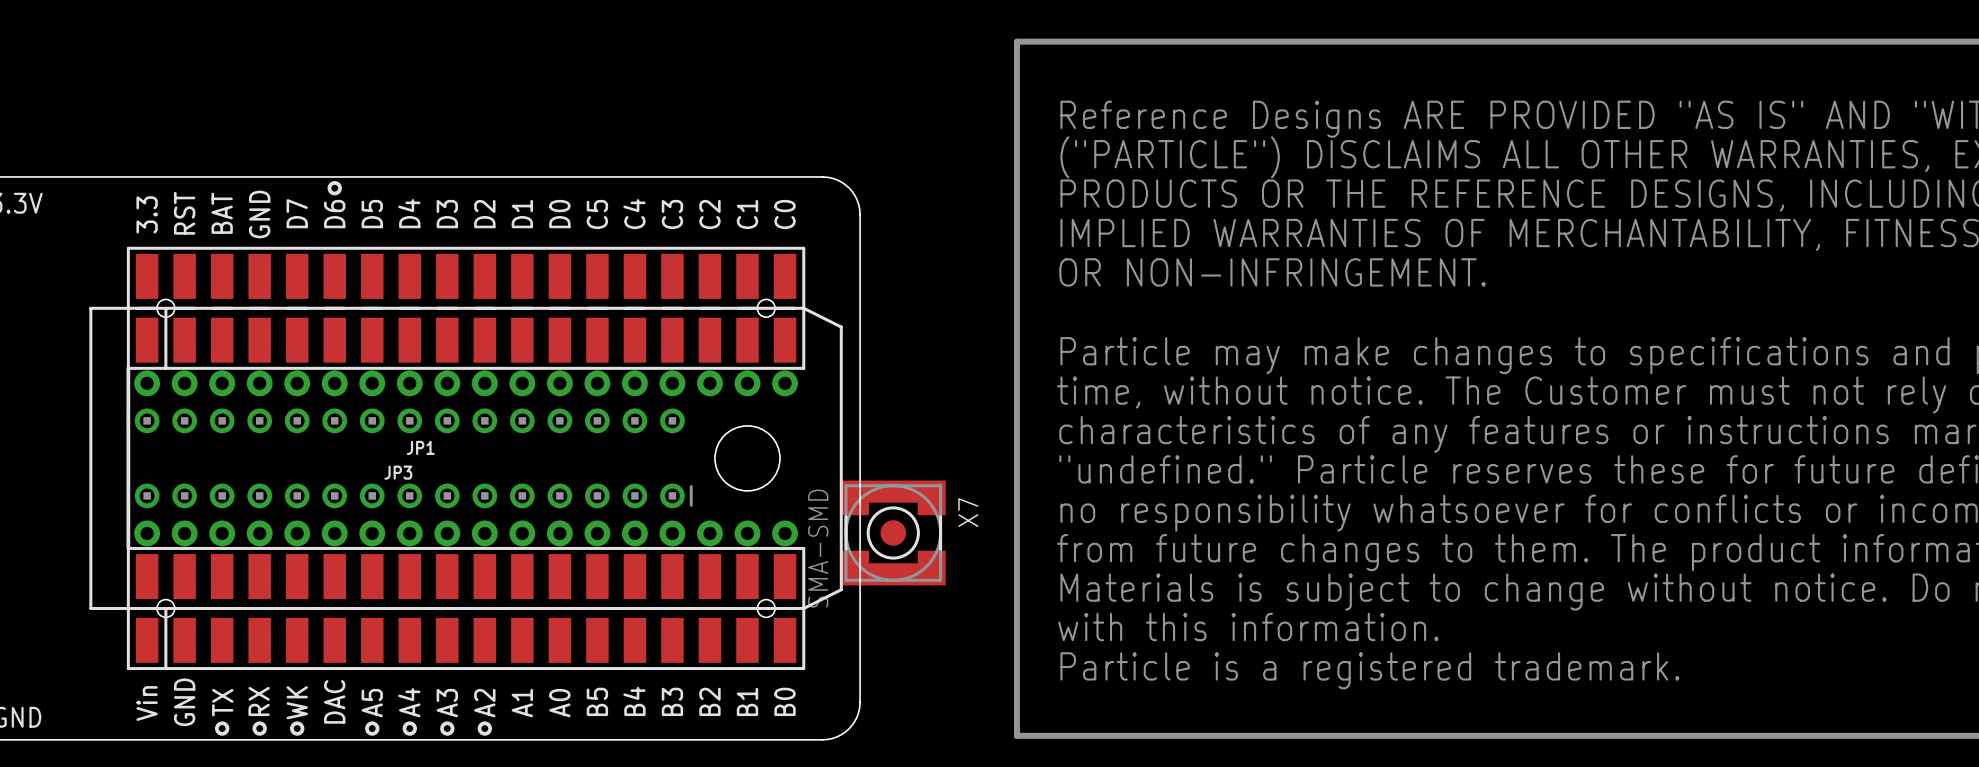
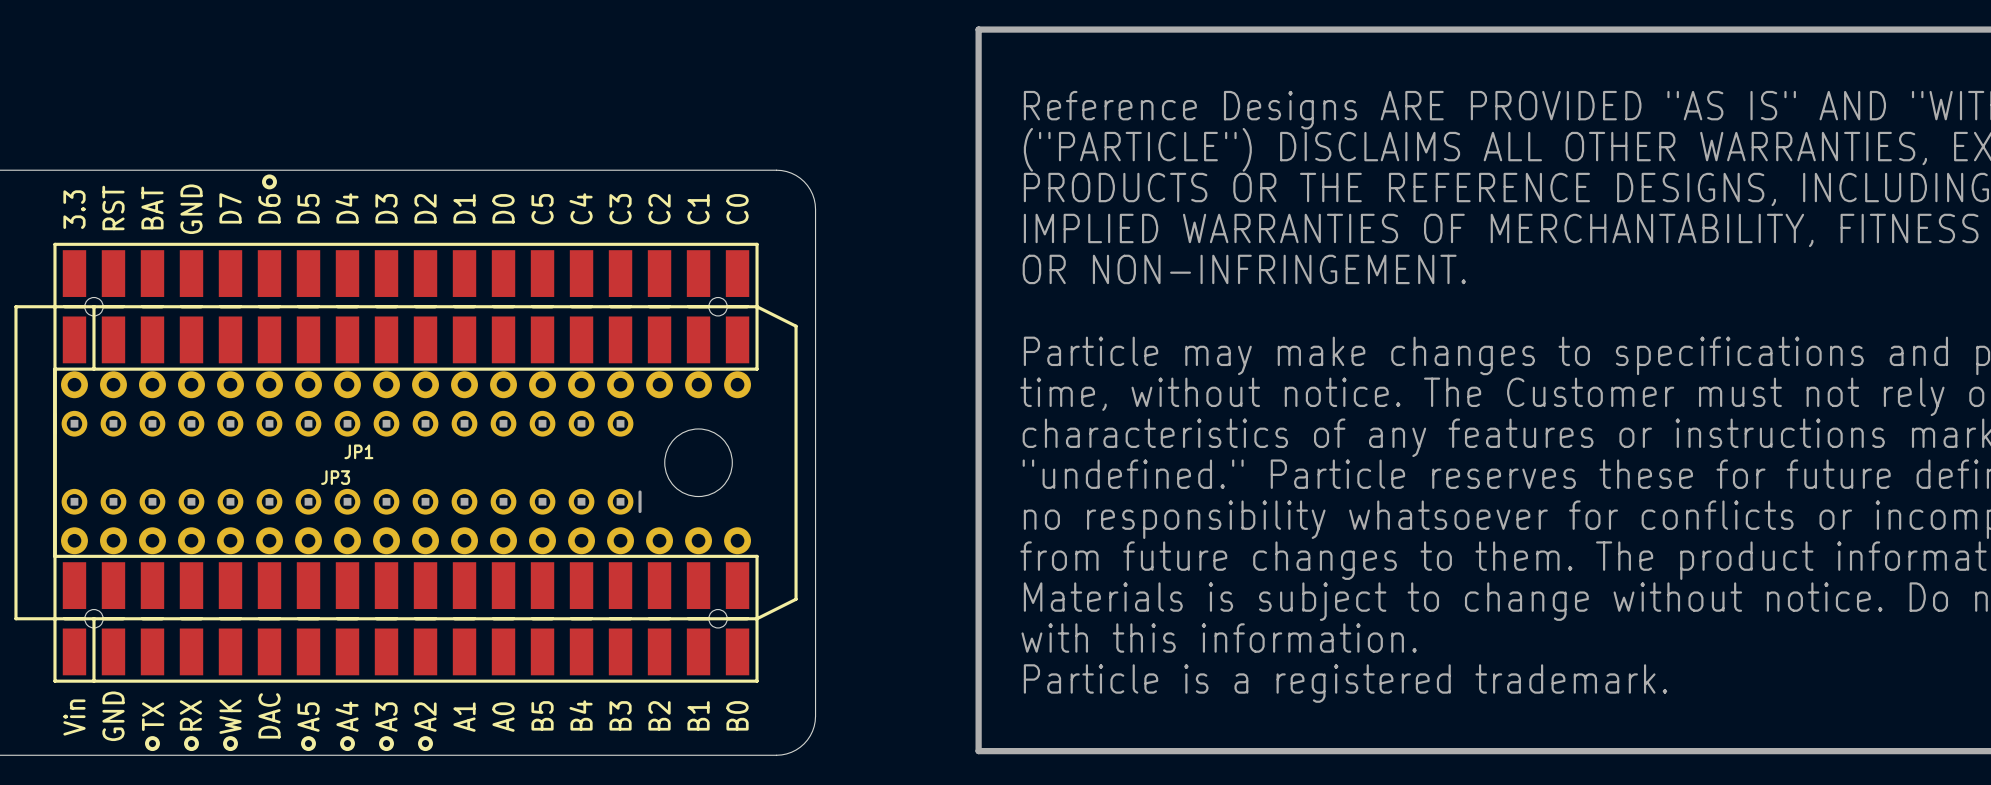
X7: SMA-SMD (893, 532) -> none

